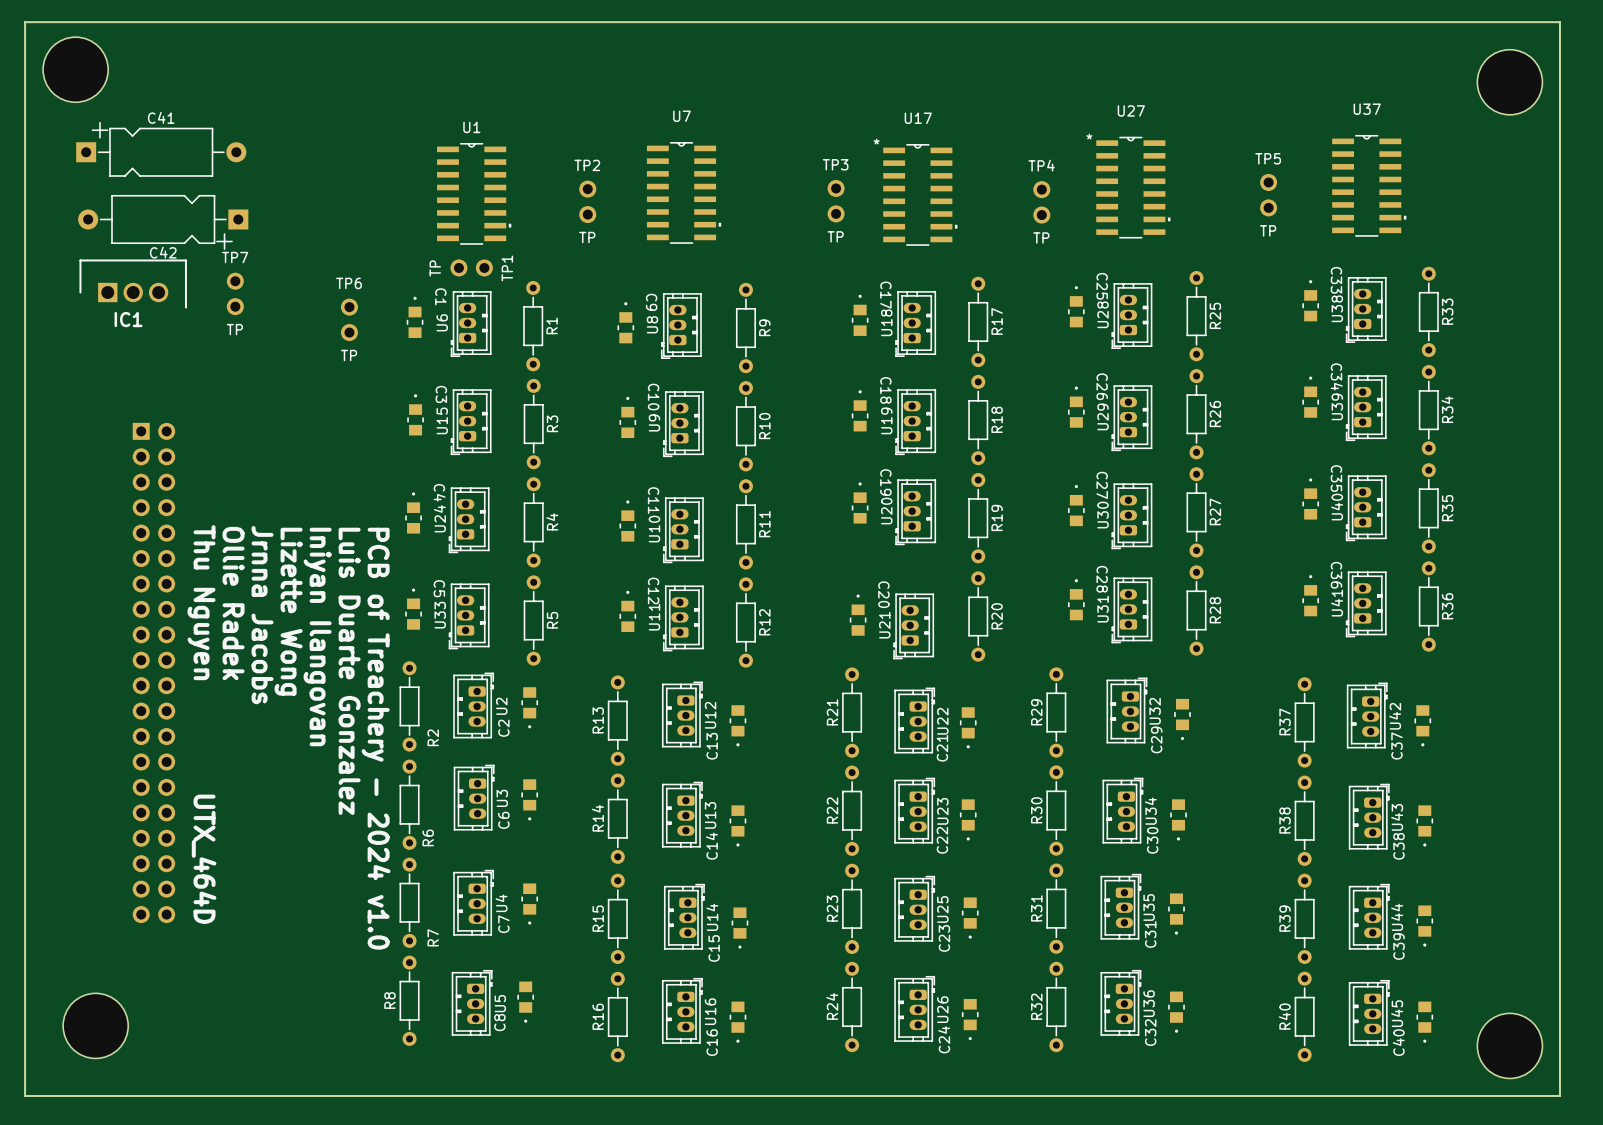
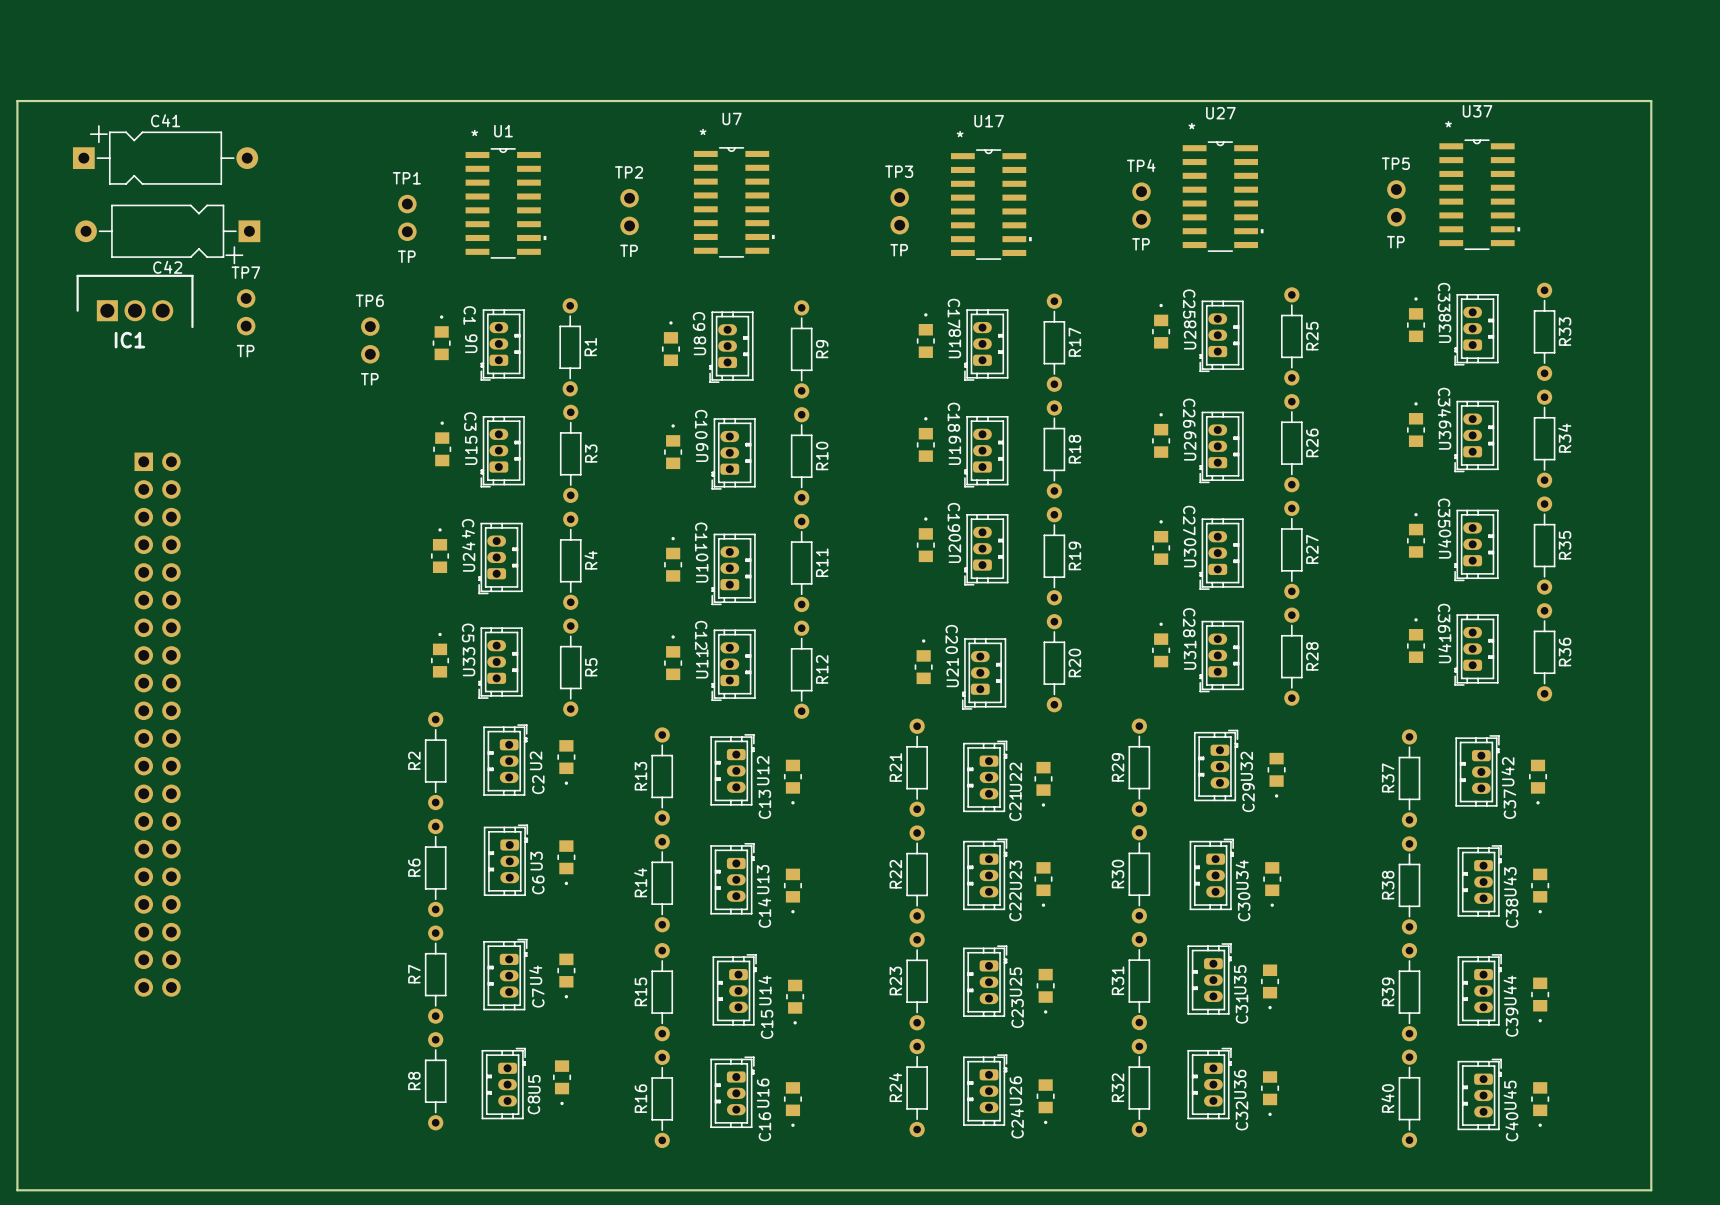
part: (75, 69) -> none
part: (1509, 82) -> none
board edge: (25, 99) (25, 22) (1559, 22) (1559, 1095) (25, 1095) -> (17, 101) (1651, 101) (1651, 1190) (17, 1190) (17, 1184)
U37 text: none -> * (1448, 124)
U7 text: none -> * (703, 131)
U1 text: none -> * (474, 132)
U27 text position: * (1089, 136) -> * (1191, 126)
U17 text position: * (876, 141) -> * (960, 134)
TP5 position: (1268, 195) -> (1396, 203)
TP4 position: (1041, 202) -> (1141, 205)
TP1 rotation: 0° (471, 267) -> 90° clockwise (407, 217)
TP1 position: (471, 267) -> (407, 217)
TP1 value position: TP (435, 268) -> TP (406, 256)
TP1 name position: TP1 (507, 268) -> TP1 (406, 178)
text: Ollie Radek (233, 603) -> none
text: Lizette Wong (288, 611) -> none
text: Jrnna Jacobs (262, 615) -> none
text: Iniyan Ilangovan (317, 636) -> none
text: Luis Duarte Gonzalez (349, 671) -> none
text: Thu Nguyen UTX_464D (201, 724) -> none
R2 name position: R2 (433, 737) -> R2 (414, 760)
text: PCB of Treachery - 2024 v1.0 (376, 738) -> none
R6 name position: R6 (428, 837) -> R6 (414, 867)
R7 name position: R7 (433, 937) -> R7 (414, 974)
part: (95, 1025) -> none
part: (1509, 1045) -> none

